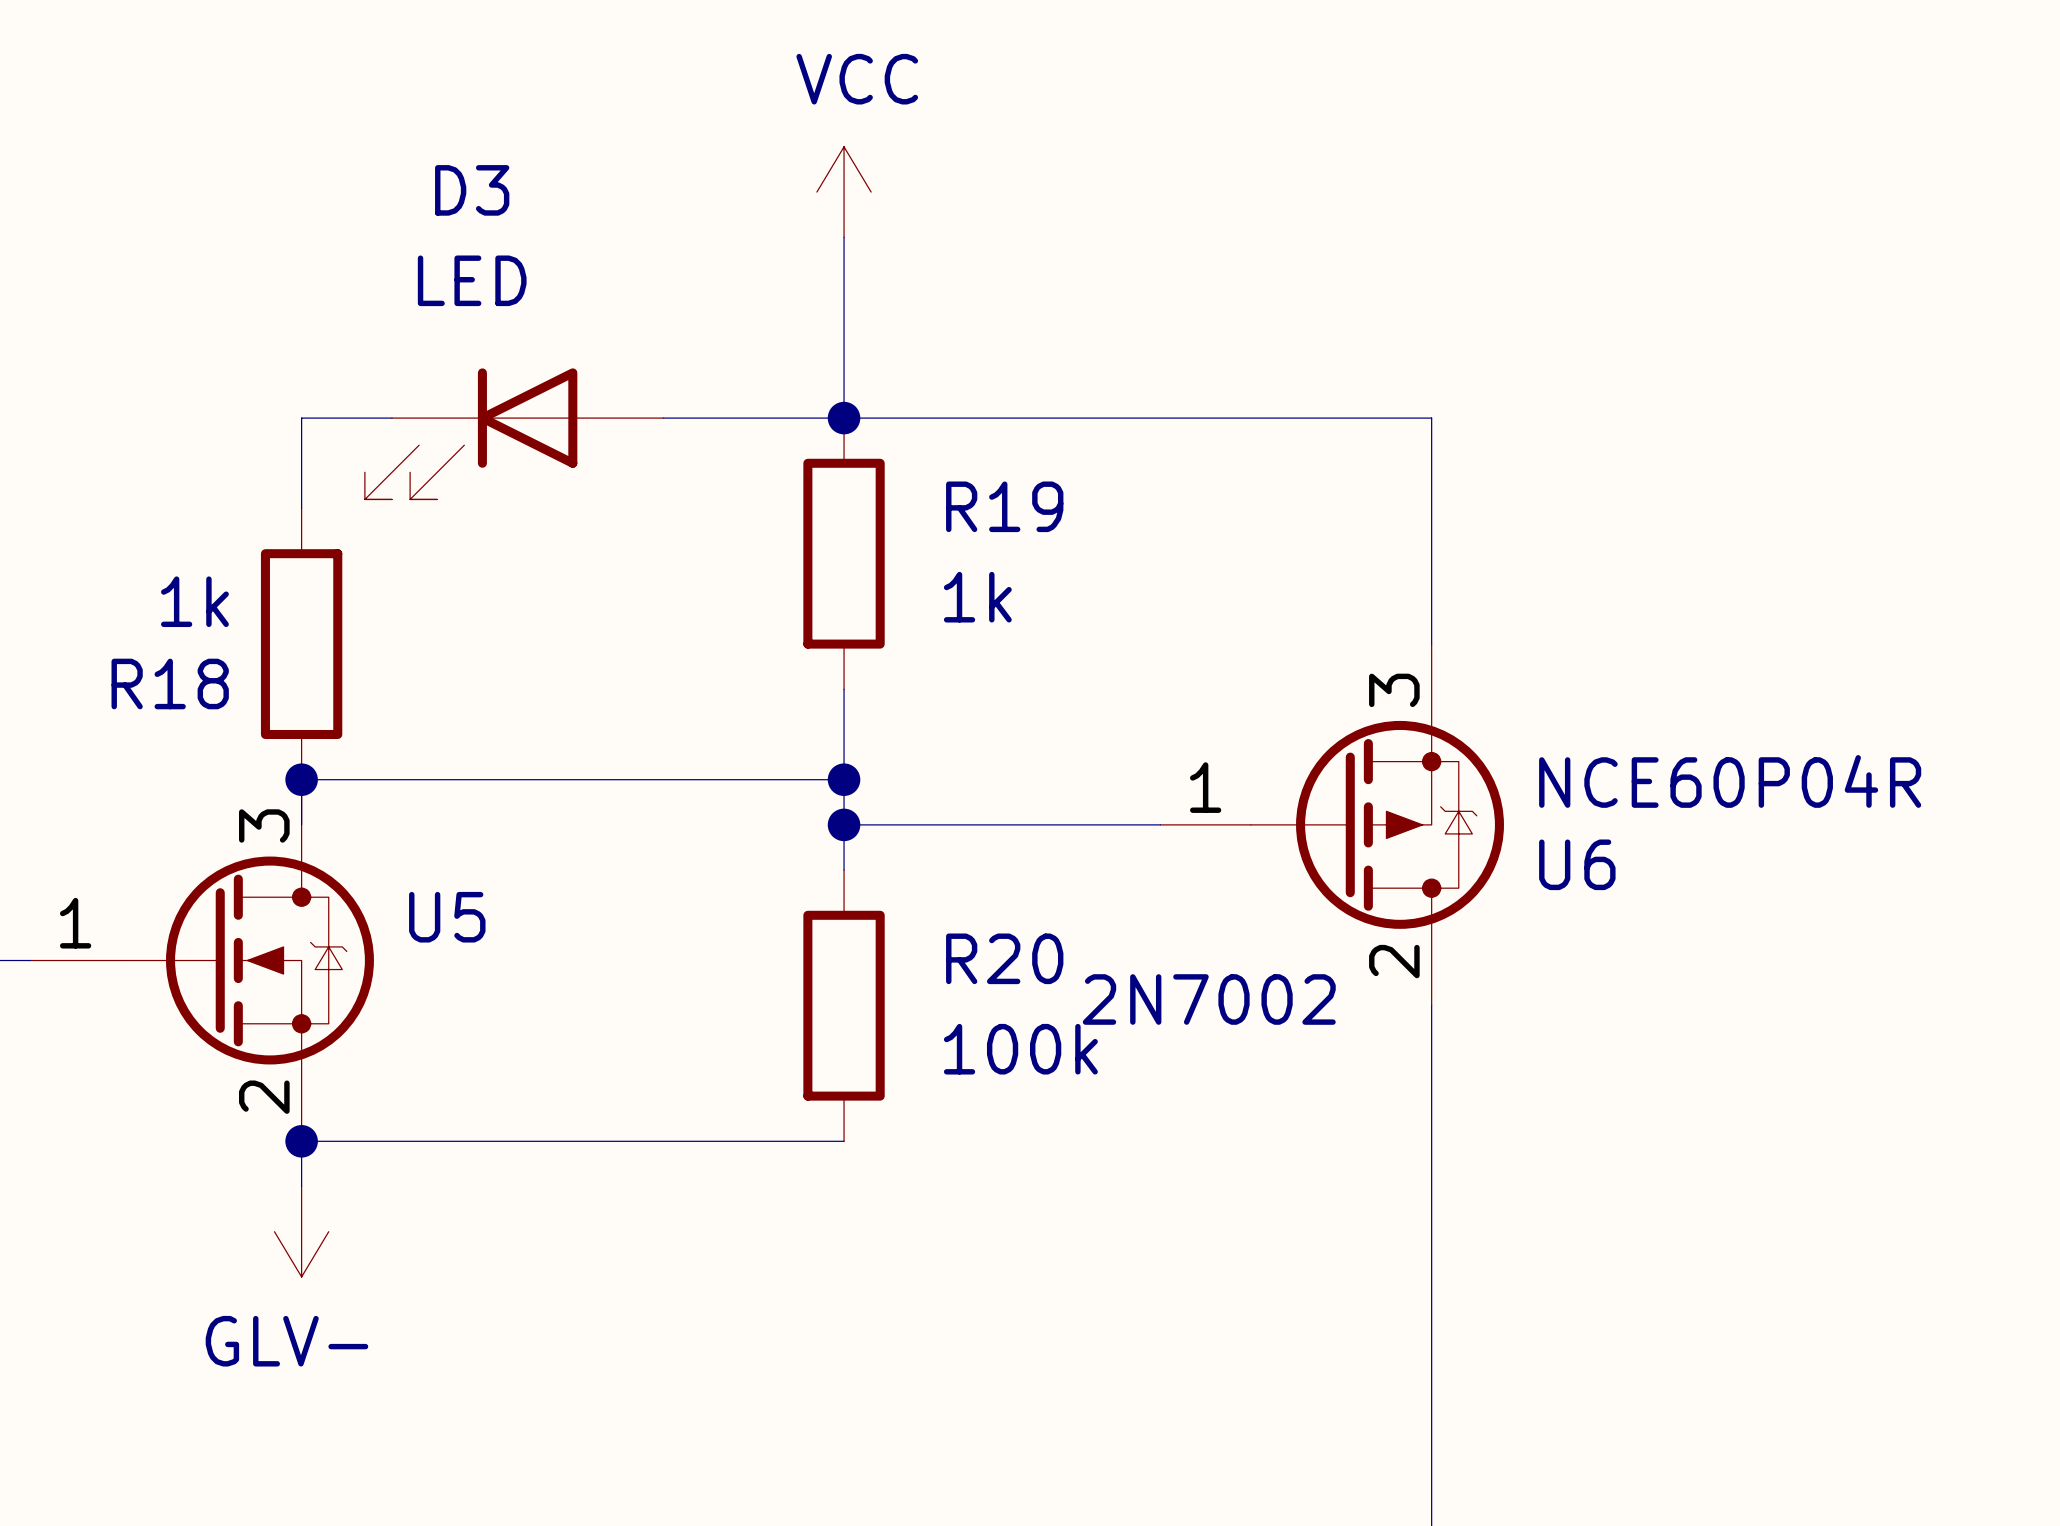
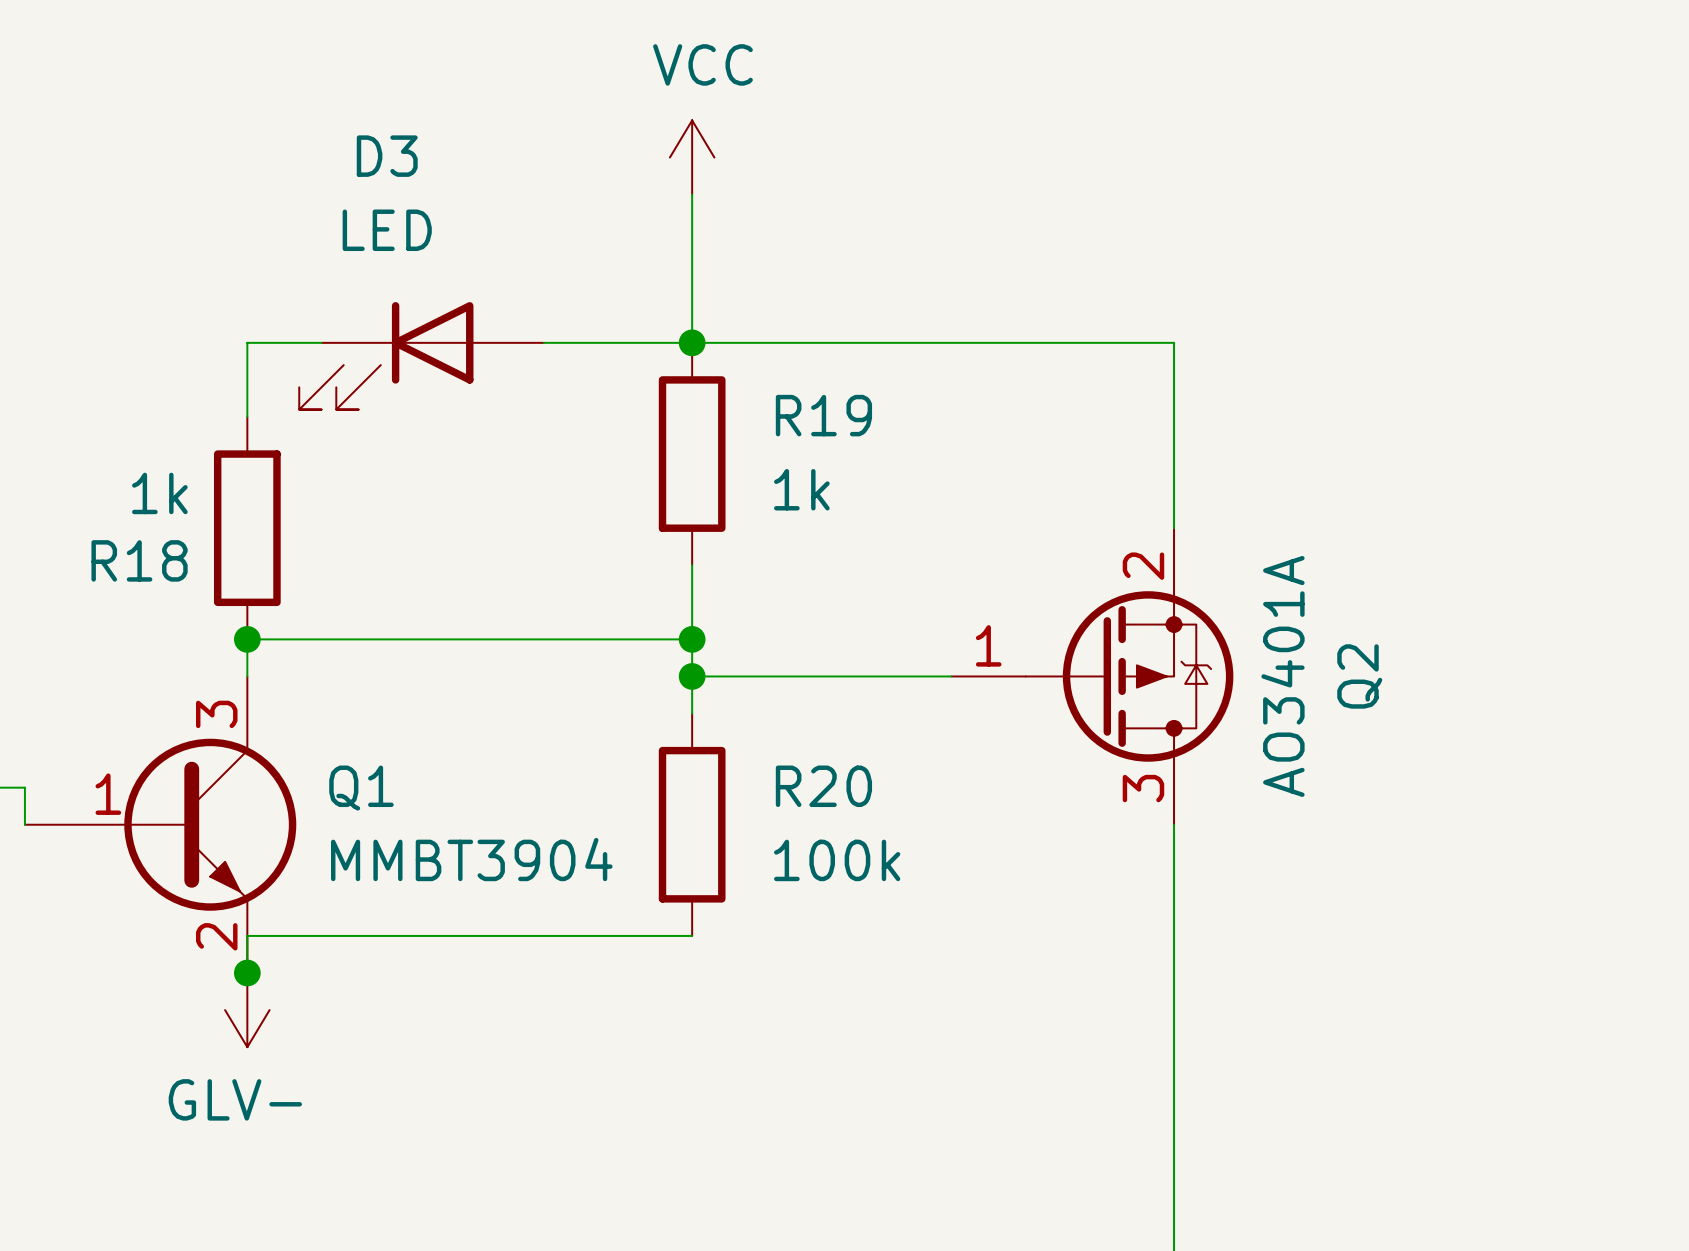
U6 pin number: 3 (1394, 690) -> 2 (1143, 566)
U6 value: NCE60P04R (1730, 781) -> AO3401A (1282, 676)
U6 name: U6 (1577, 864) -> Q2 (1359, 676)
wire: none -> (24, 787) (24, 824)
U5: 2N7002 (202, 960) -> none
U6 pin number: 2 (1394, 961) -> 3 (1143, 788)
Q1: none -> MMBT3904 (160, 824)
junction position: (301, 1141) -> (247, 973)

